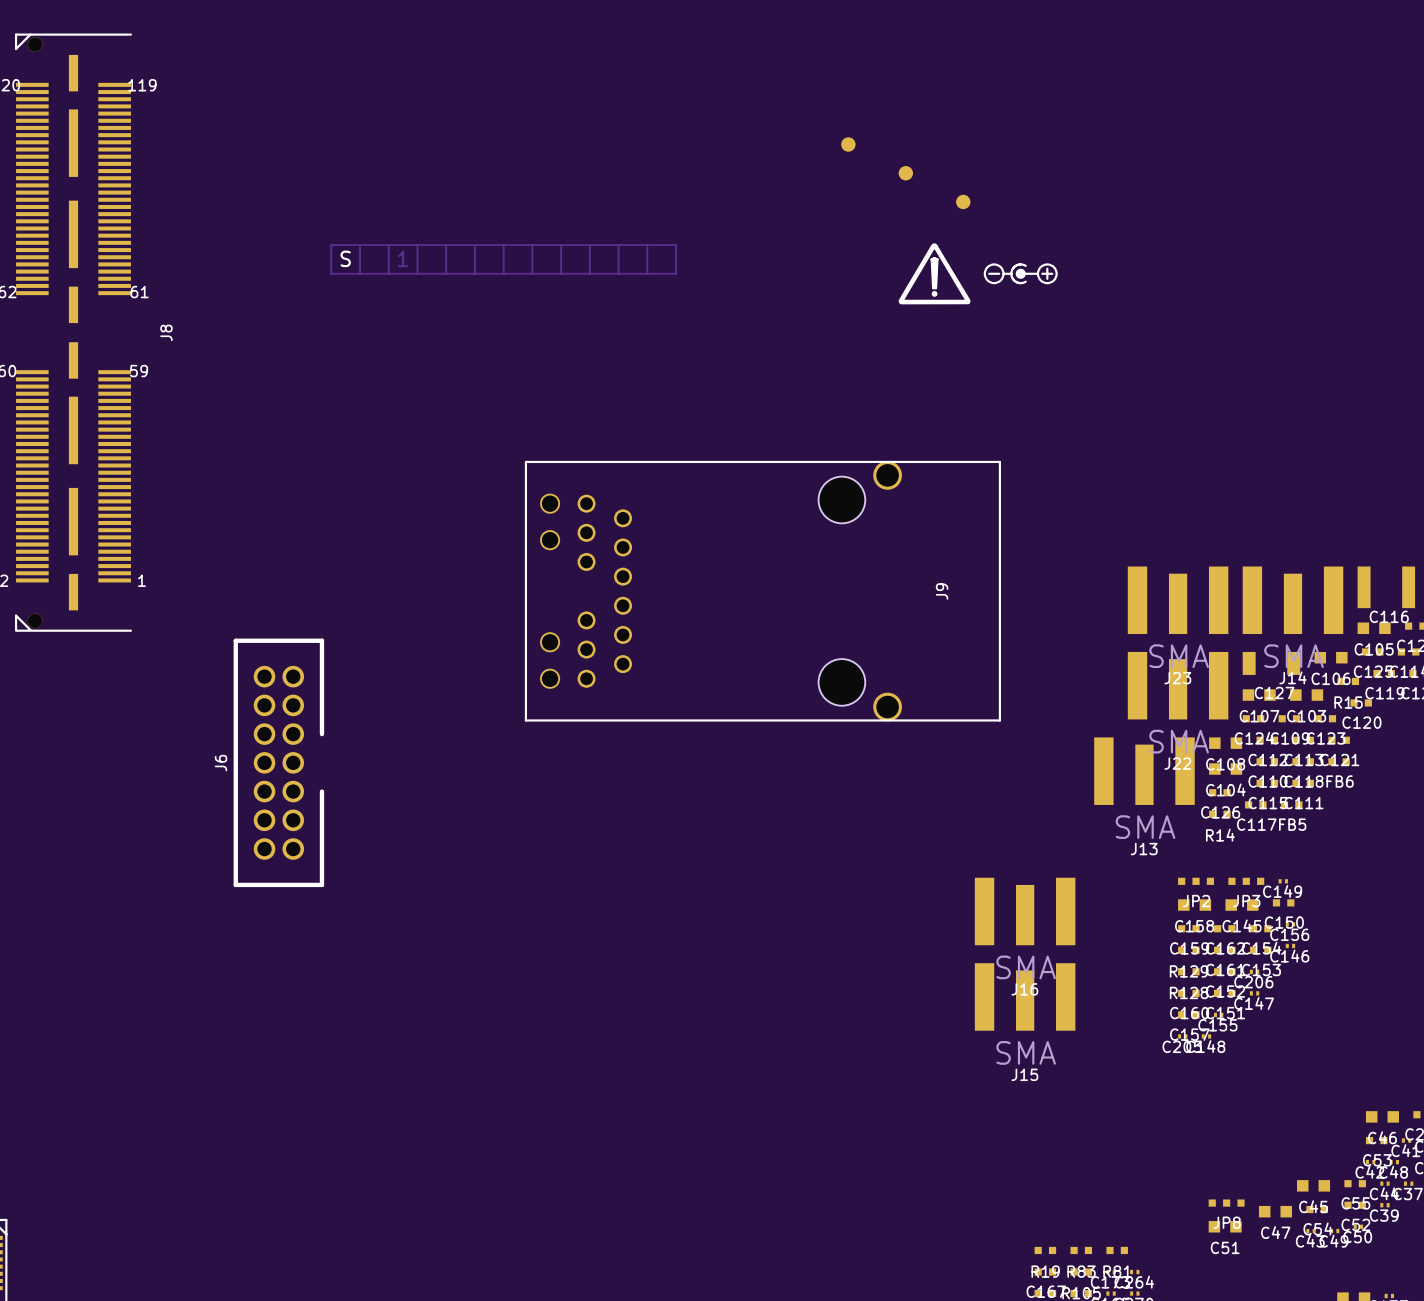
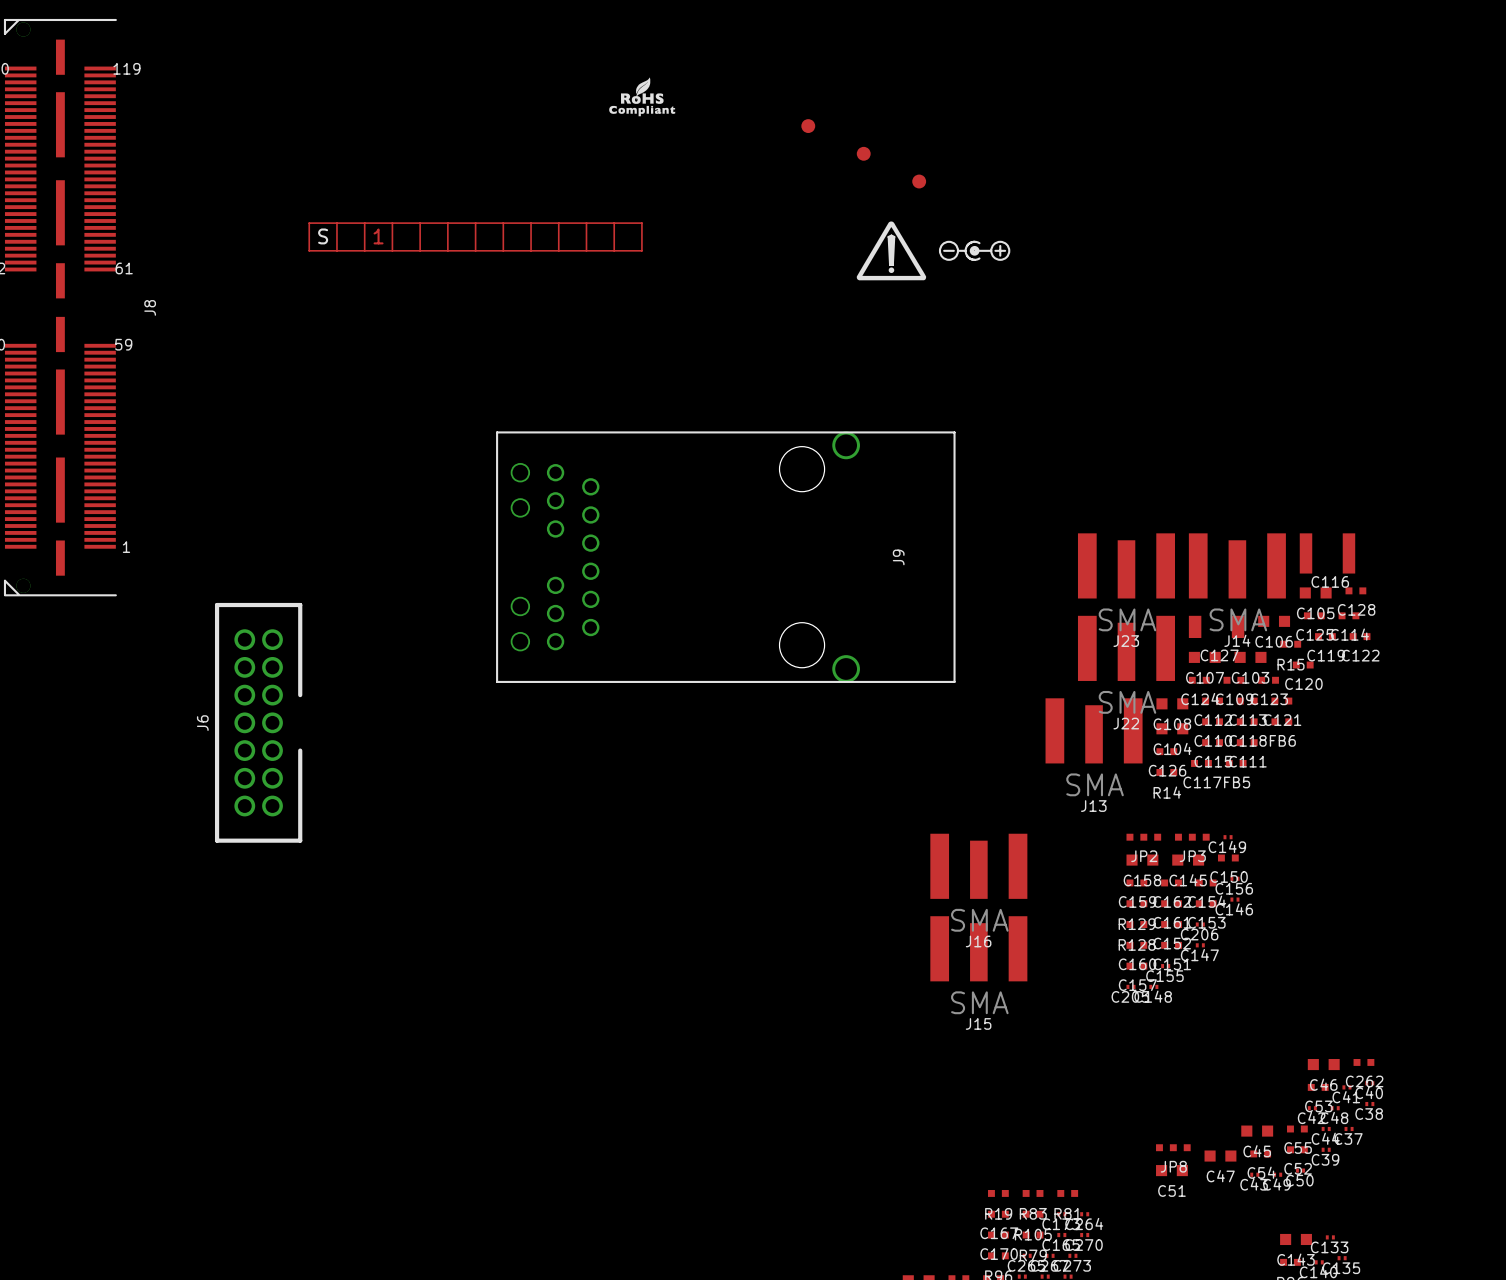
drawing: none -> [609, 77, 676, 117]

